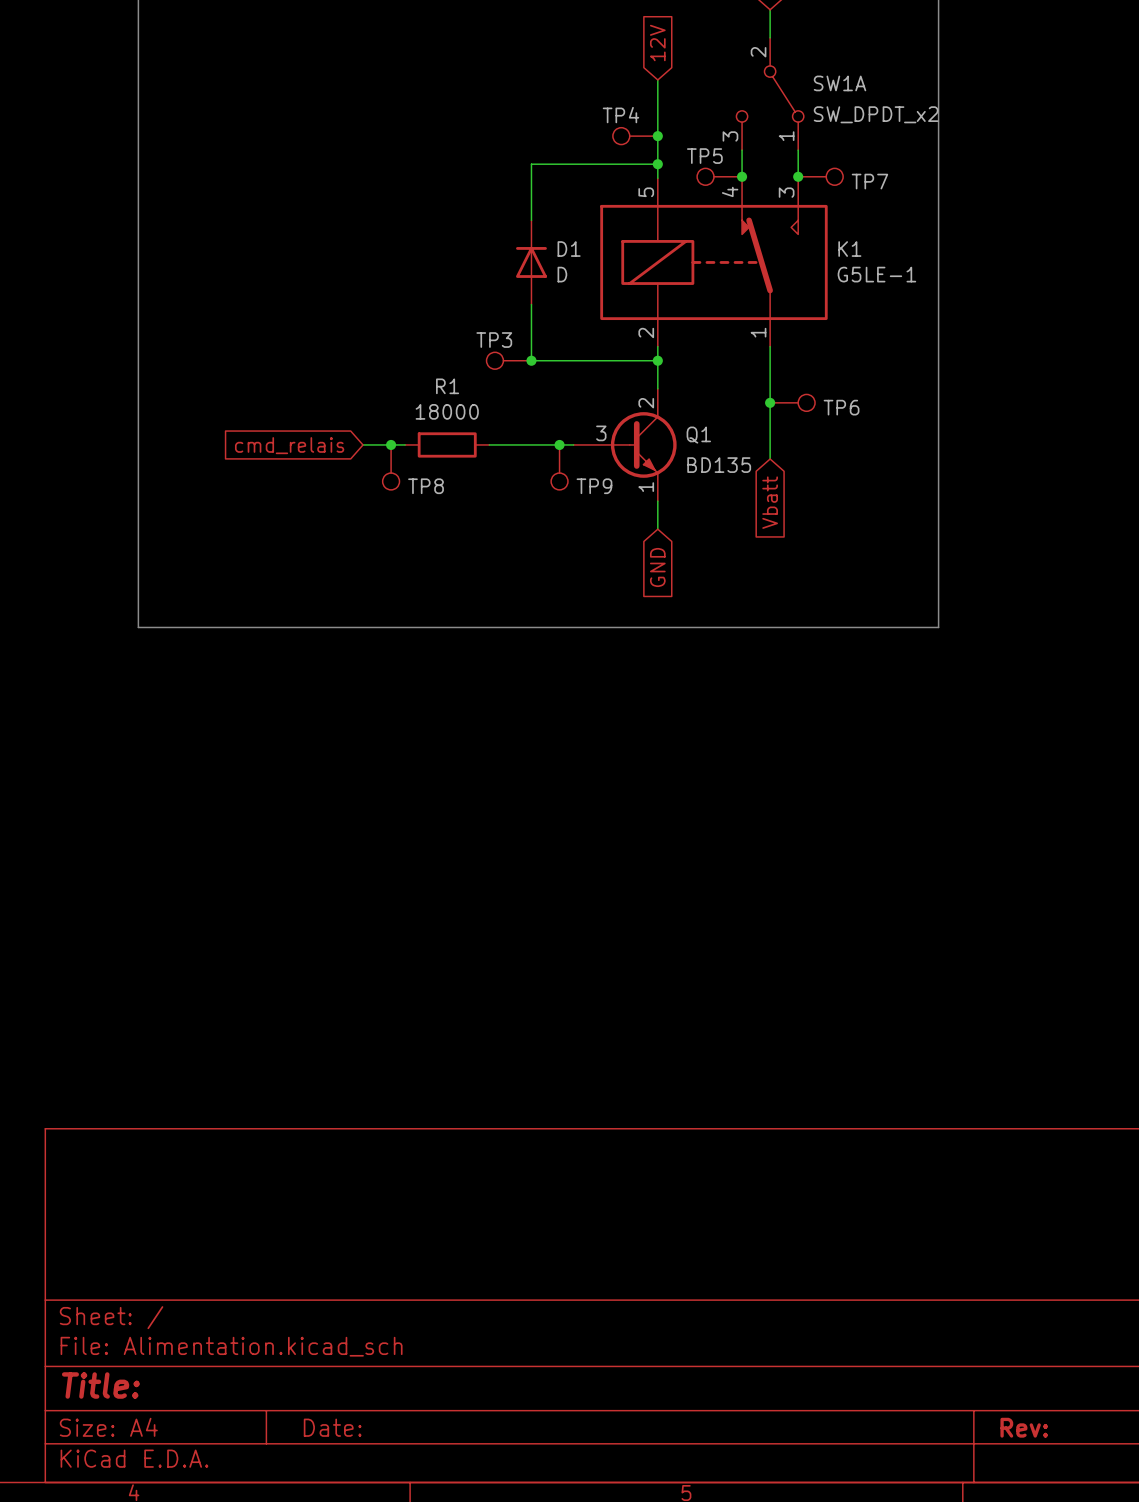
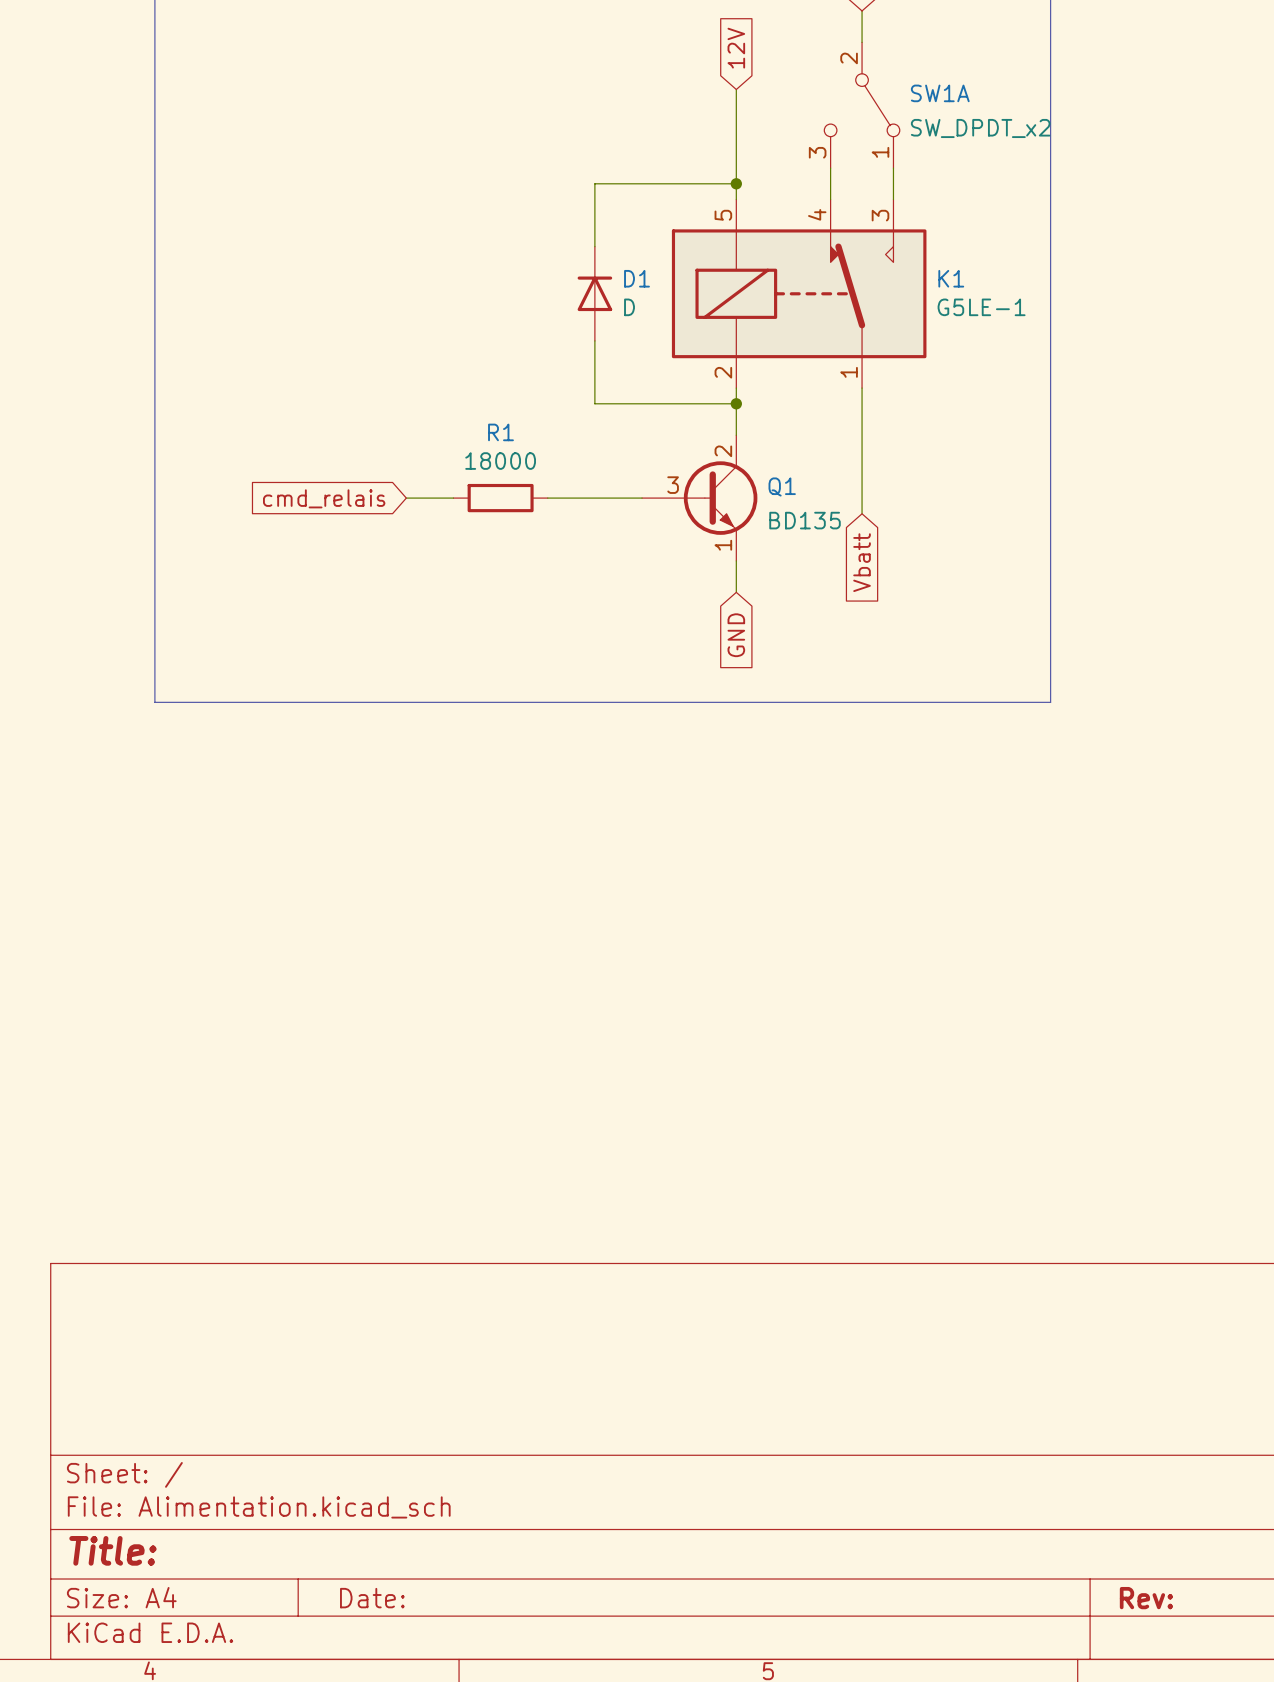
TP4: (635, 136) -> none
junction: (657, 136) -> none
TP5: (719, 176) -> none
junction: (742, 176) -> none
junction: (798, 176) -> none
TP7: (820, 176) -> none
TP3: (509, 360) -> none
junction: (531, 360) -> none
junction: (770, 402) -> none
TP6: (792, 402) -> none
junction: (391, 444) -> none
junction: (559, 444) -> none
TP8: (391, 467) -> none
TP9: (559, 467) -> none

